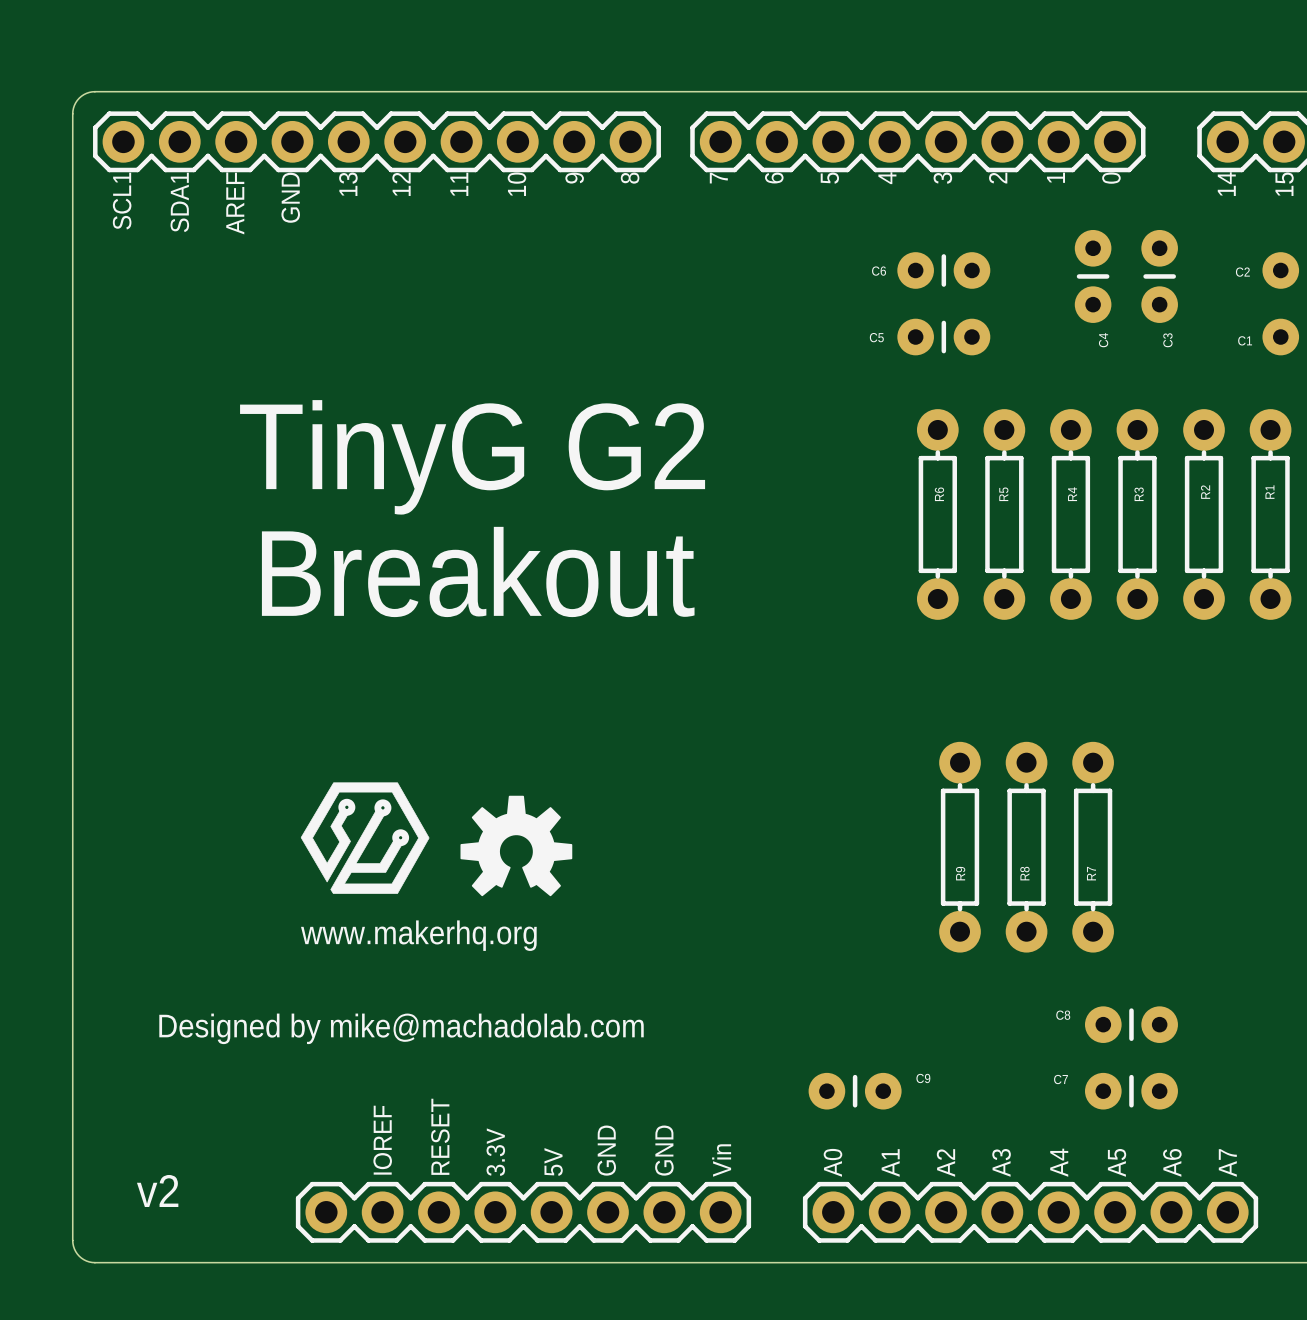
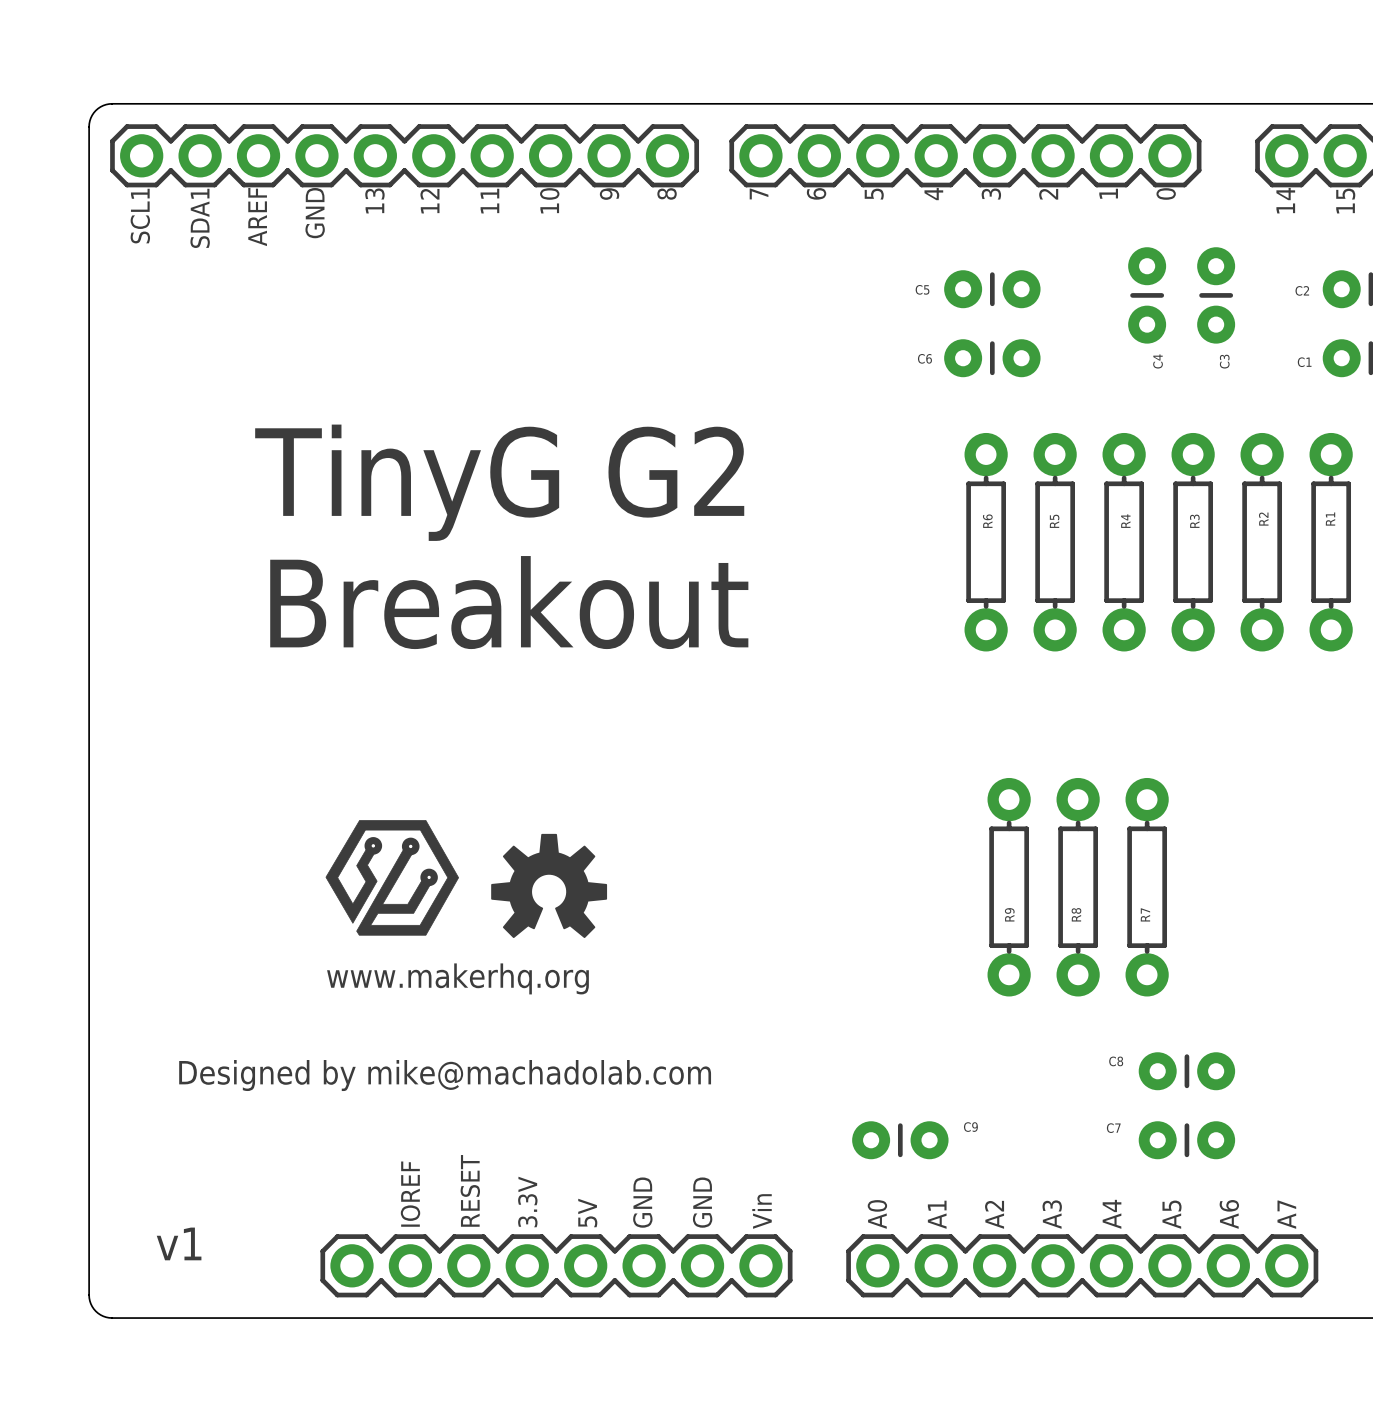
C6 name: C6 (879, 271) -> C5 (922, 289)
C5 name: C5 (876, 337) -> C6 (924, 358)
text: v2 (157, 1190) -> v1 (179, 1243)

